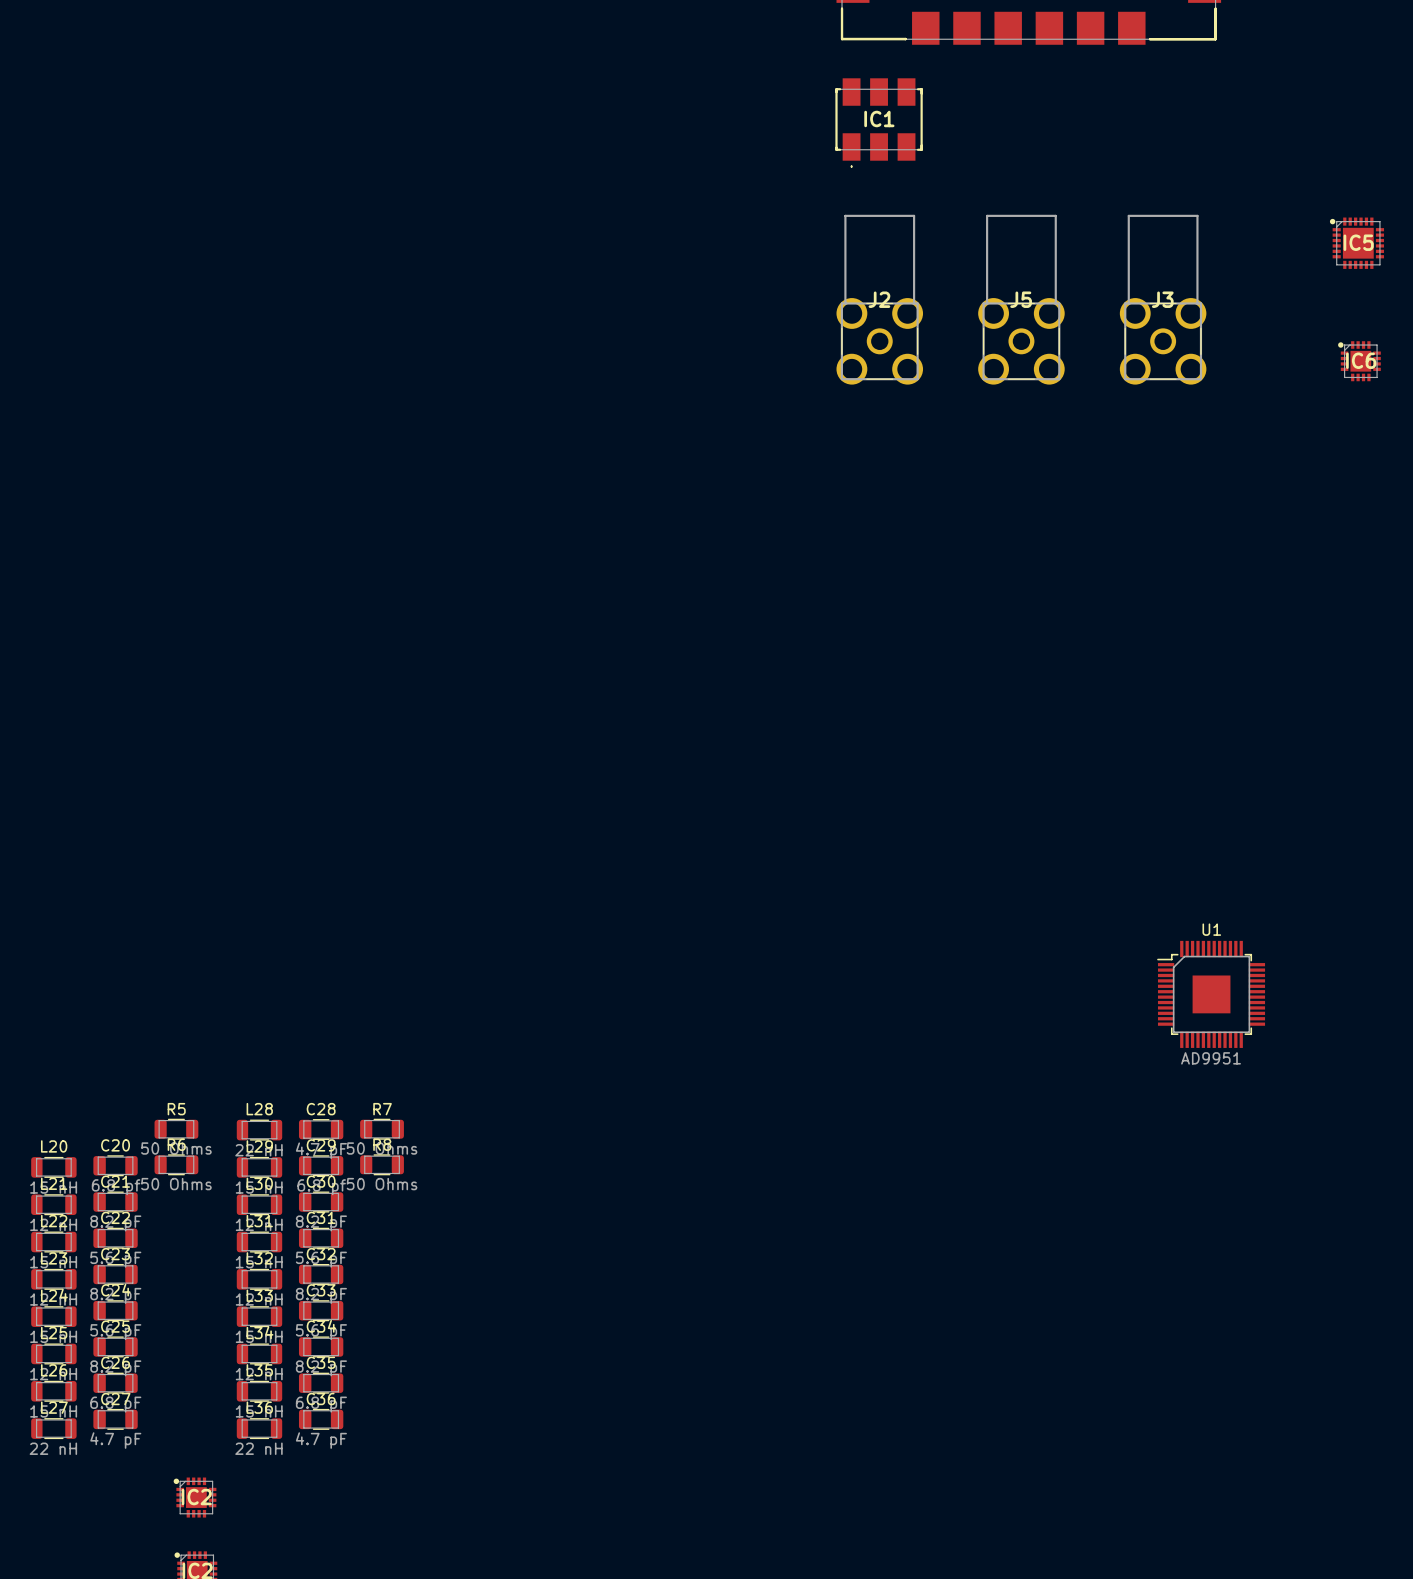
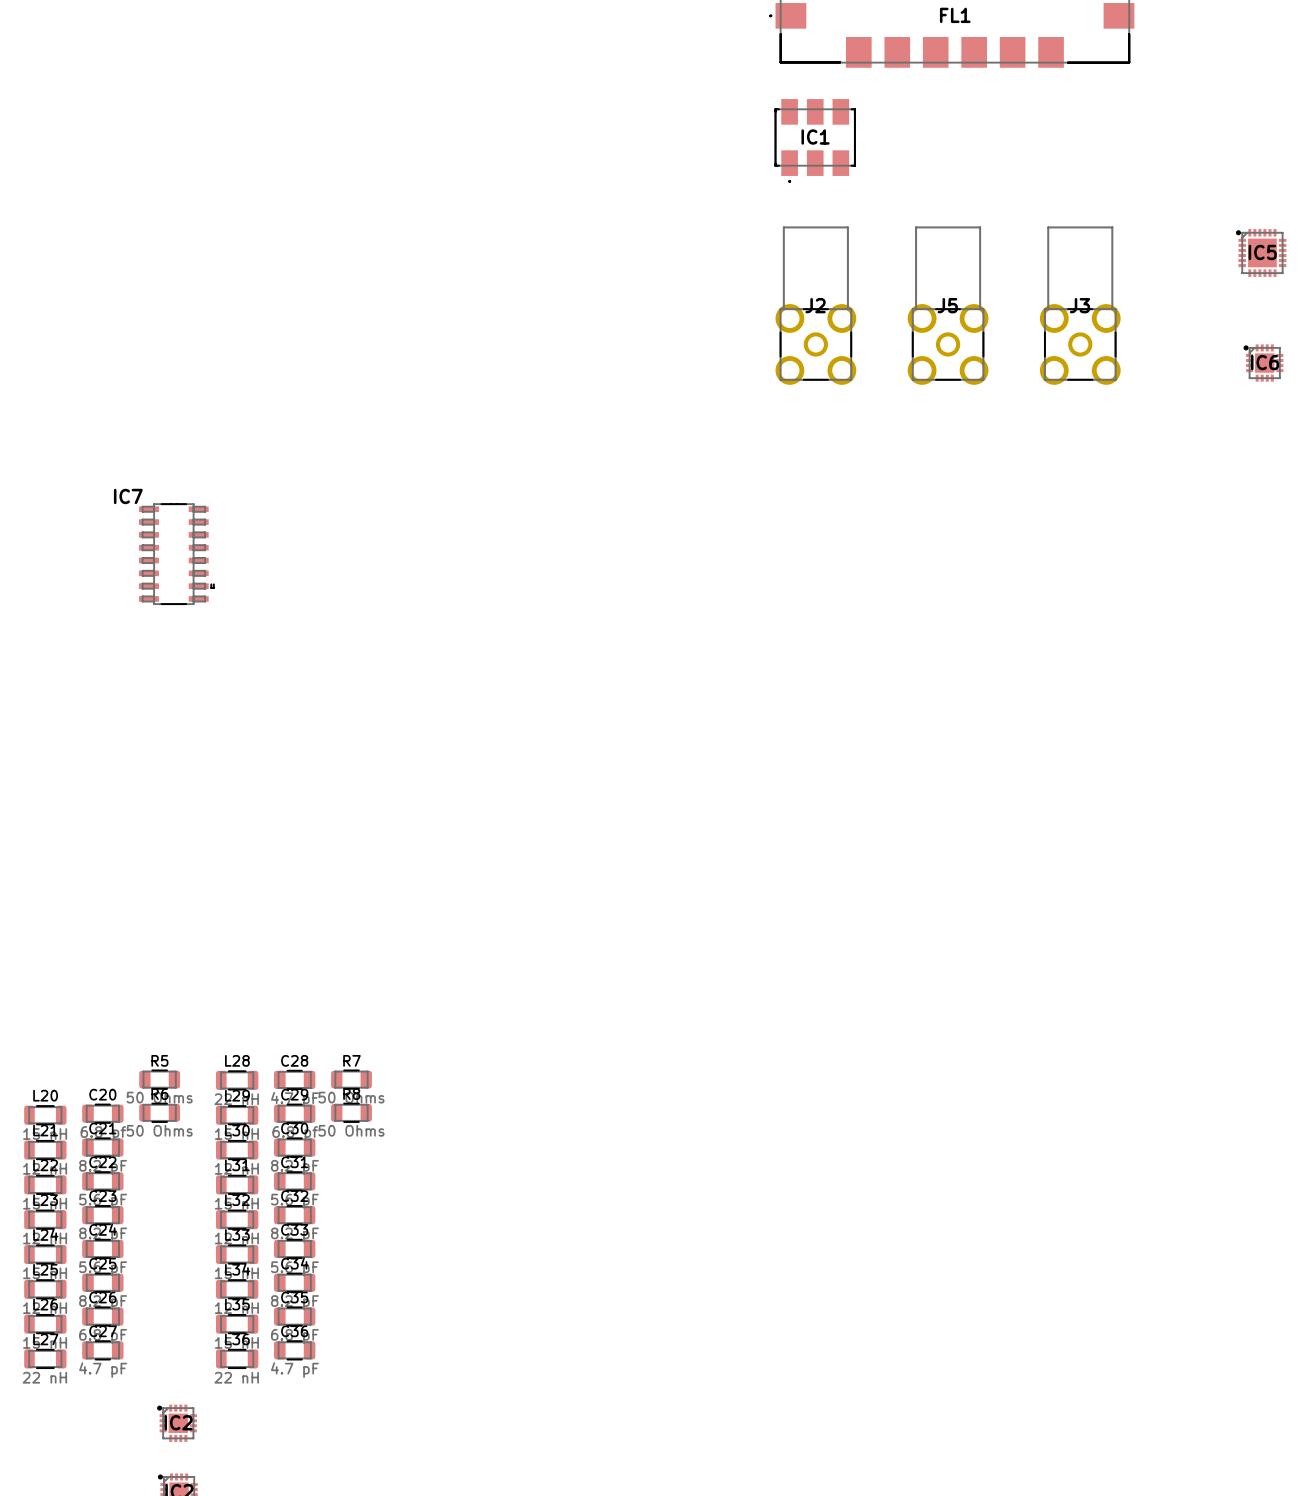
IC7: none -> (176, 554)
U1: AD9951 (1211, 994) -> none

